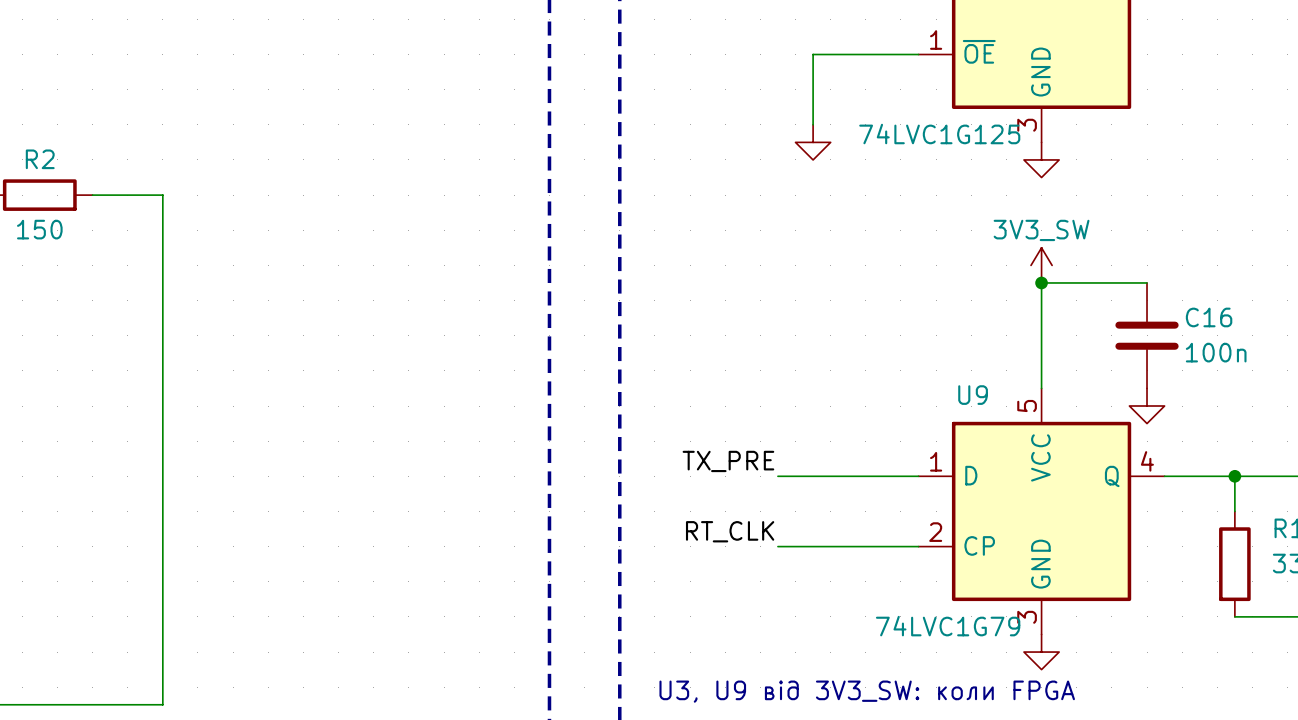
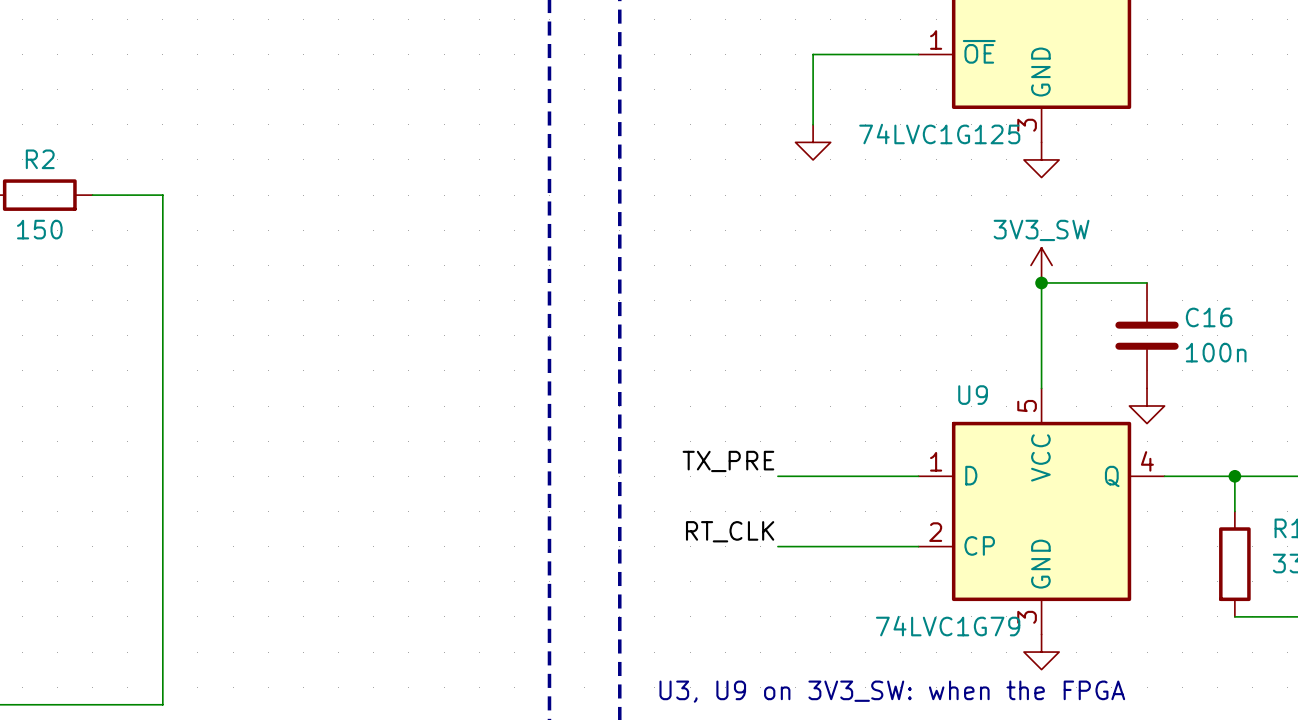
text: U3, U9 від 3V3_SW: коли FPGA (867, 691) -> U3, U9 on 3V3_SW: when the FPGA (892, 691)

